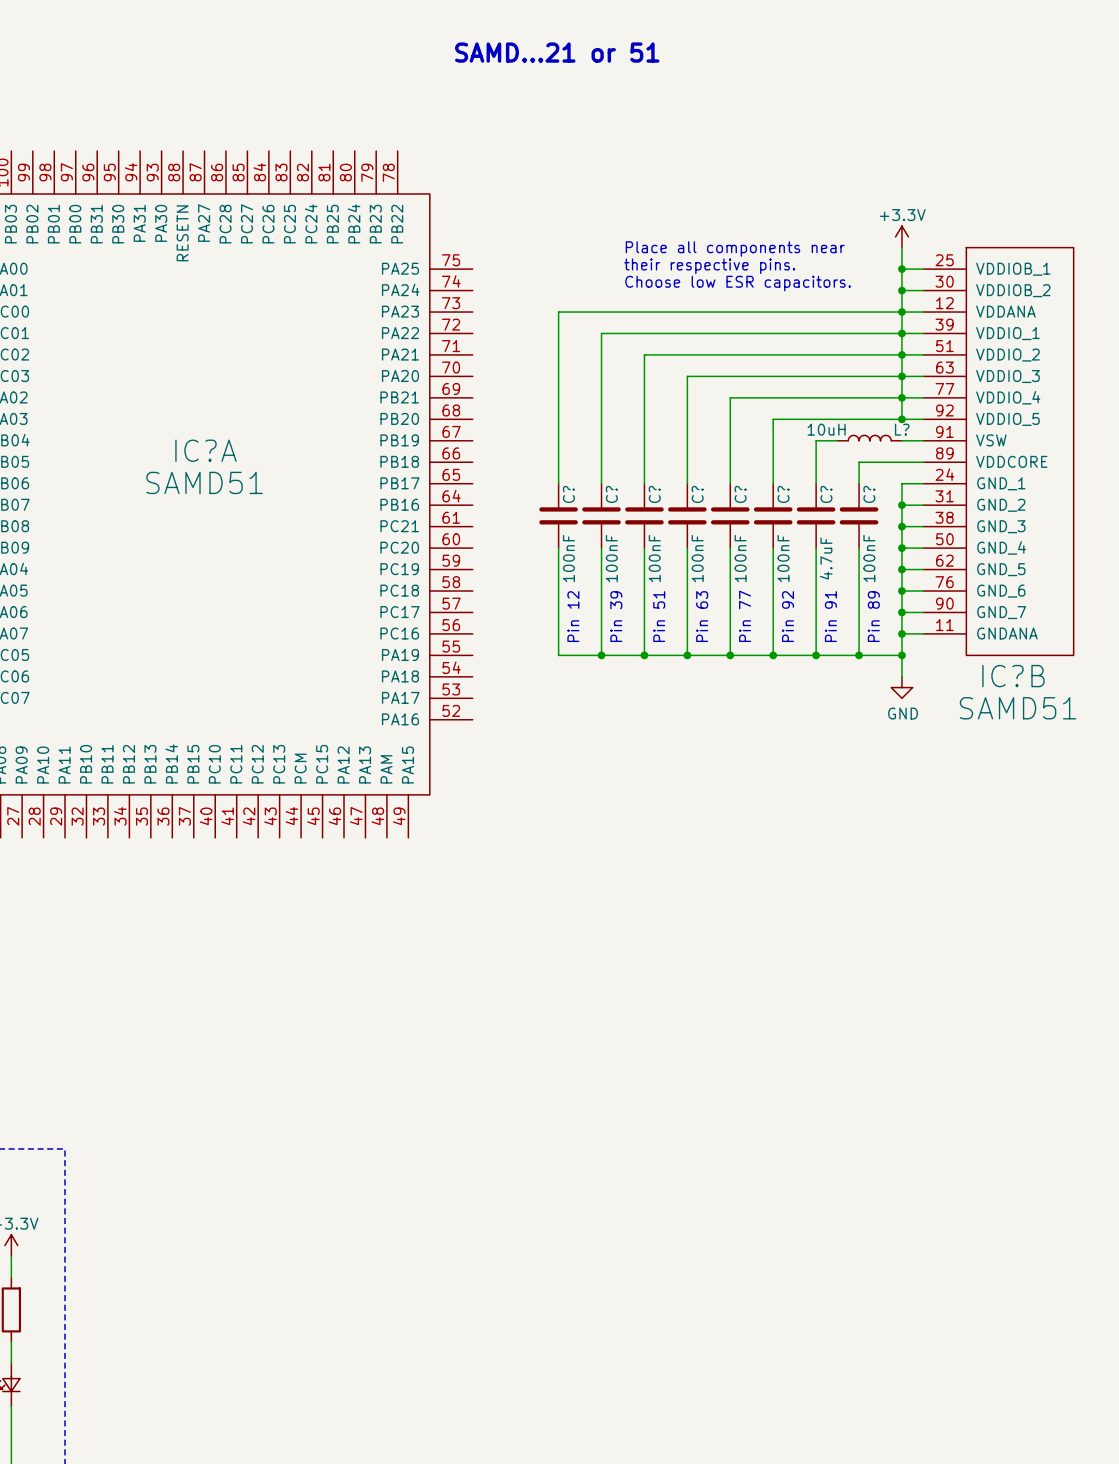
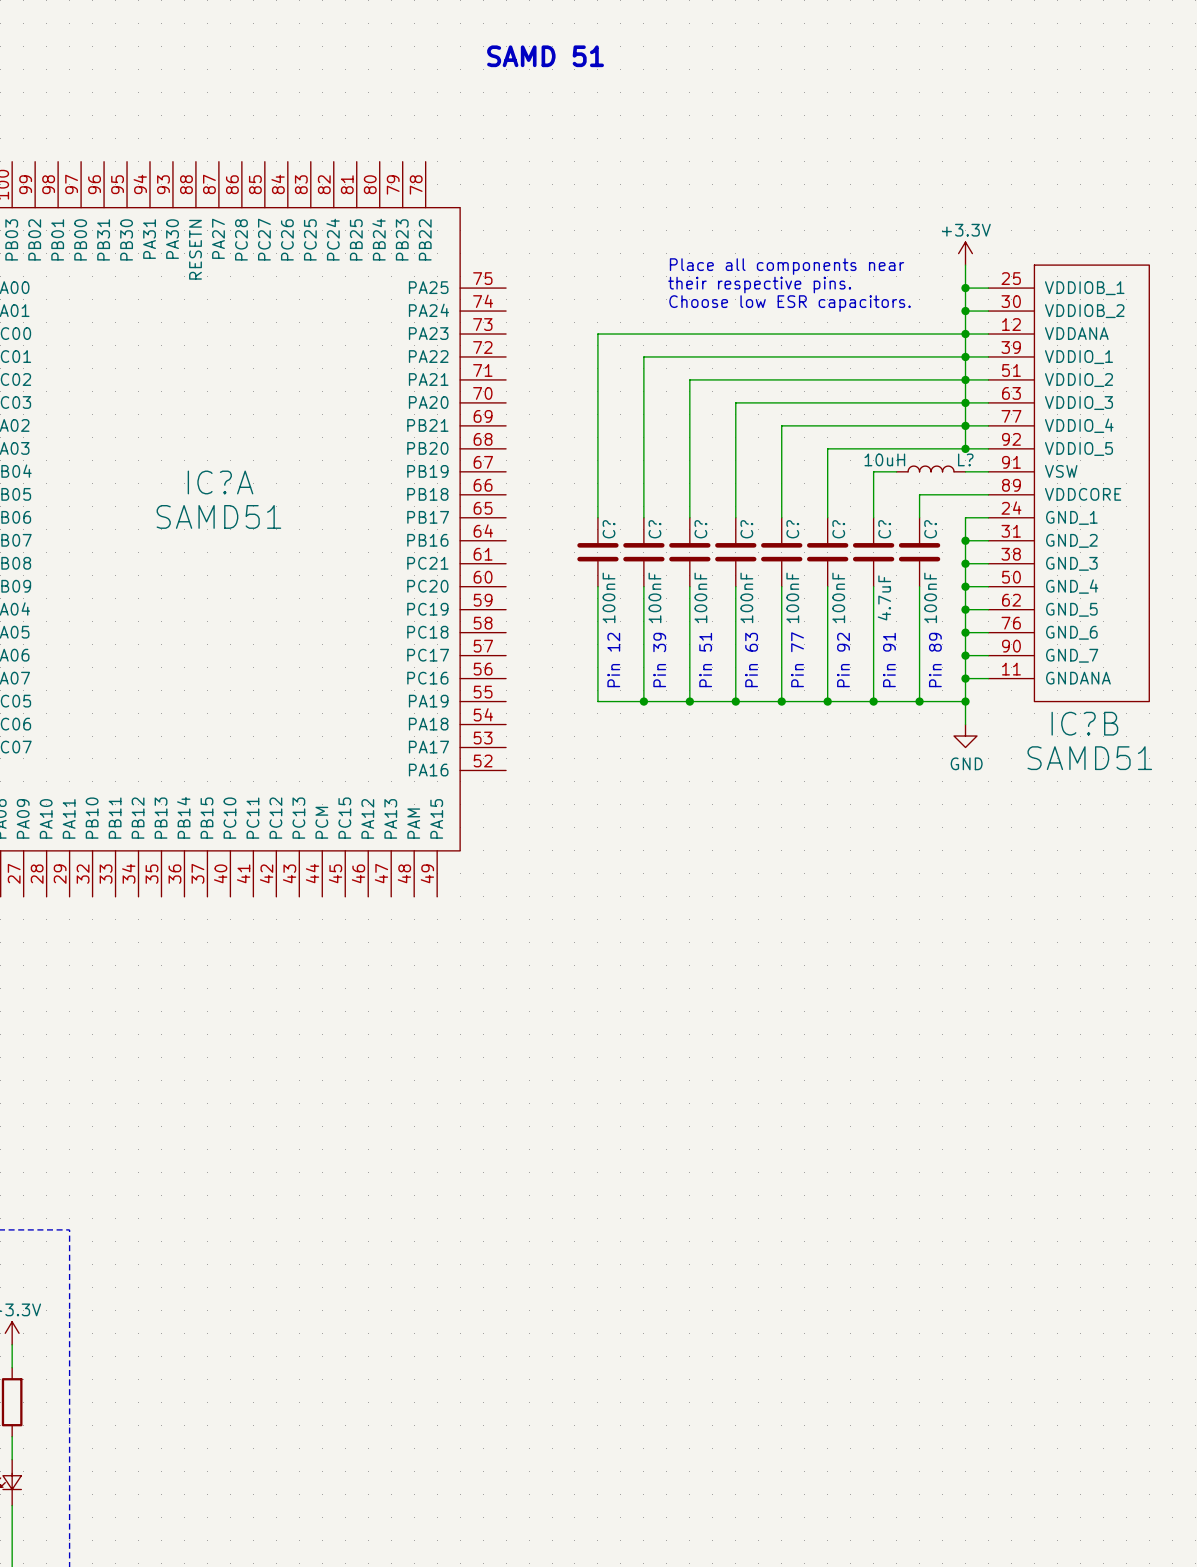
text: SAMD...21 or 51 (557, 52) -> SAMD 51 (545, 56)

